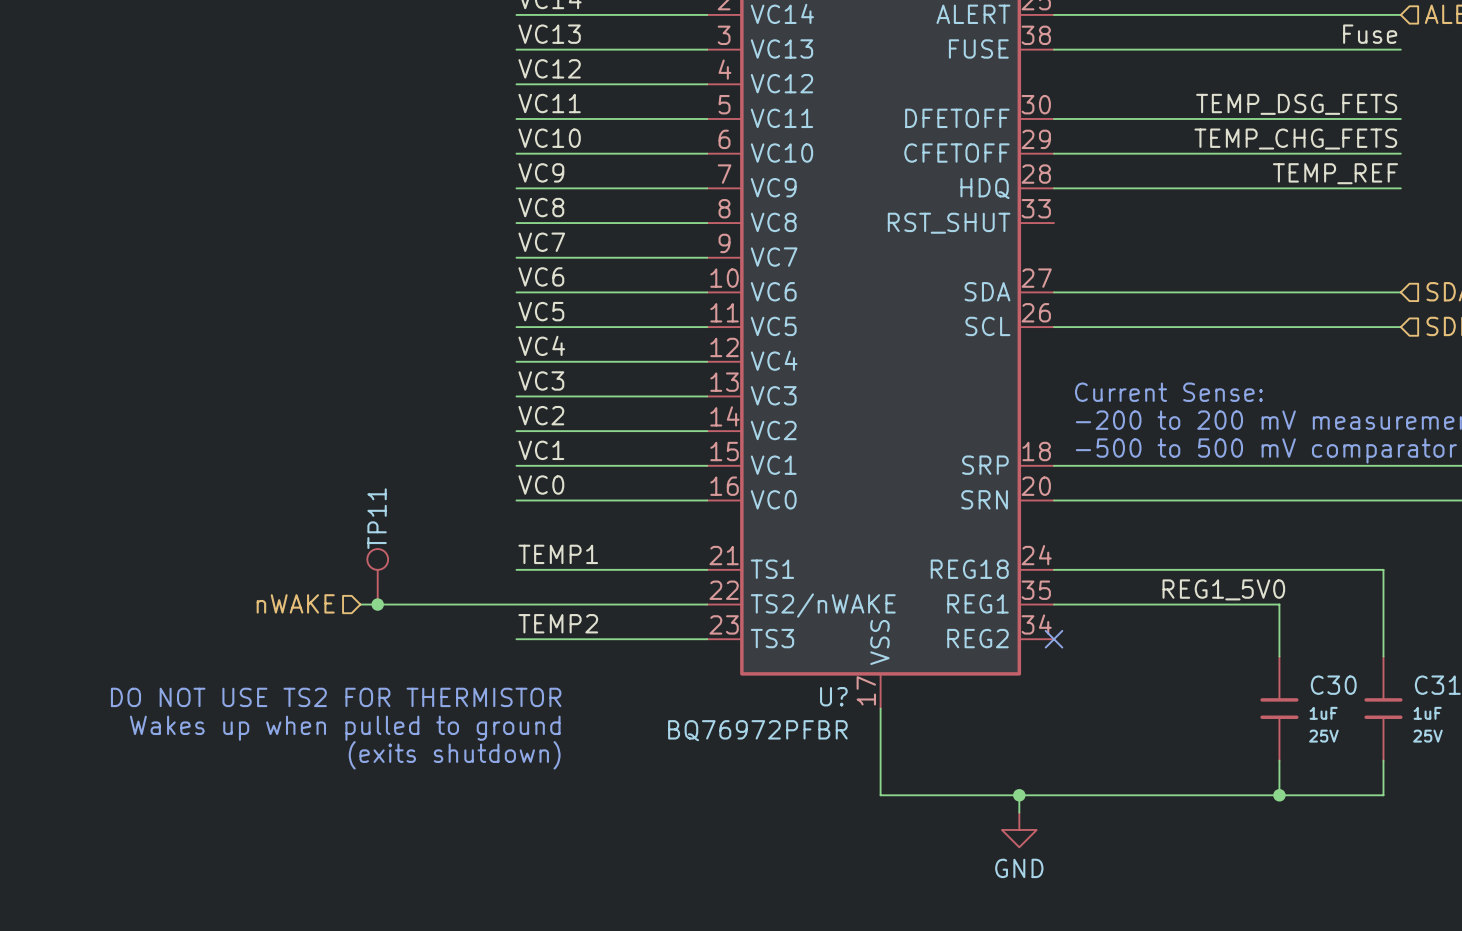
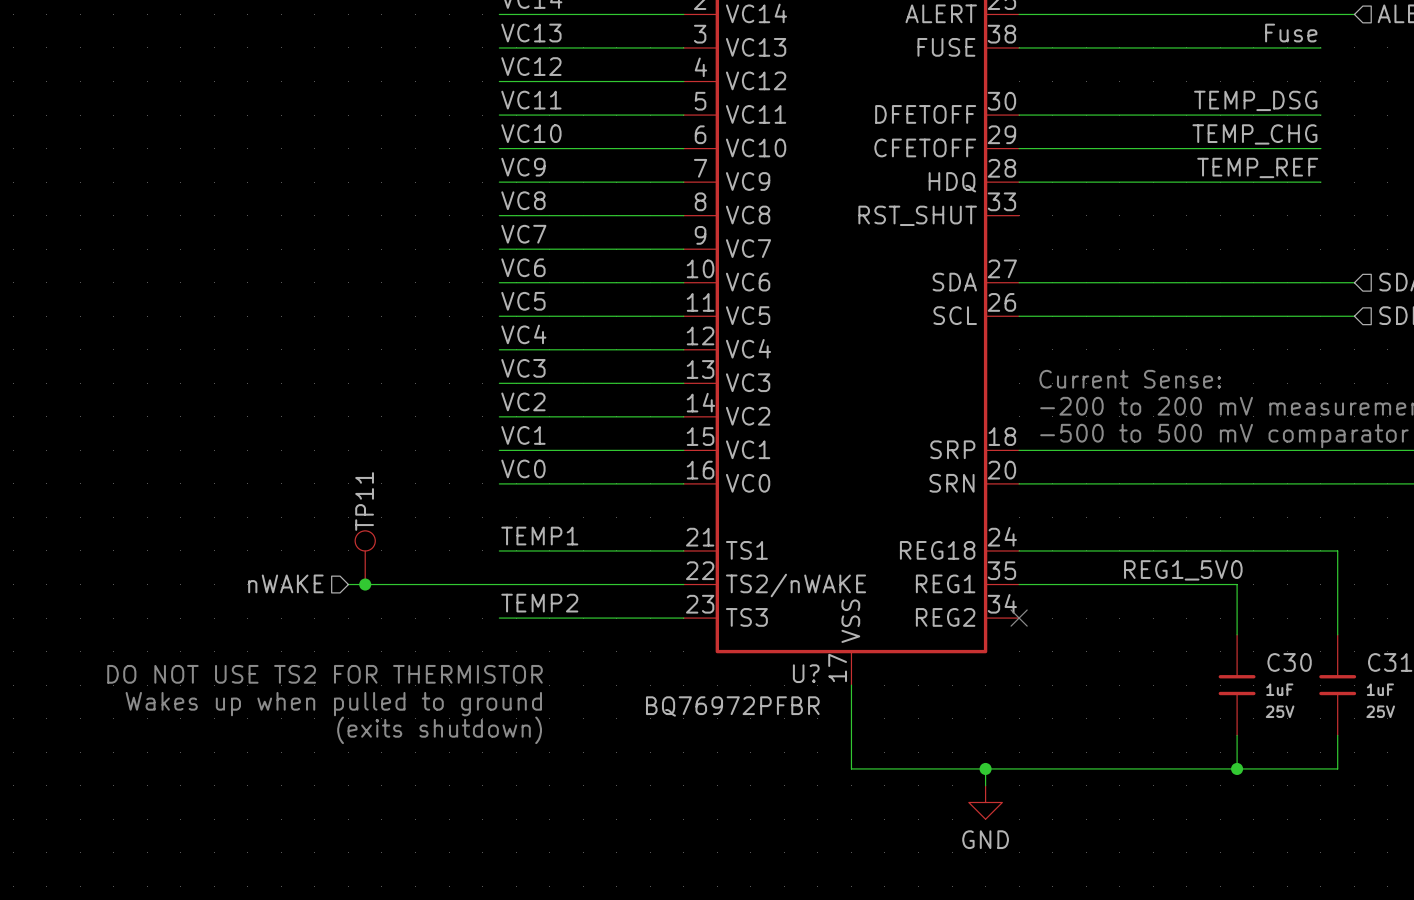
label position: Fuse (1370, 34) -> Fuse (1291, 33)
wire: (1366, 49) (1400, 49) -> none
label: TEMP_DSG_FETS (1296, 104) -> TEMP_DSG (1255, 100)
wire: (1366, 118) (1400, 118) -> none
label: TEMP_CHG_FETS (1295, 139) -> TEMP_CHG (1254, 134)
wire: (1366, 153) (1400, 153) -> none
label position: TEMP_REF (1335, 173) -> TEMP_REF (1257, 167)
wire: (1366, 188) (1400, 188) -> none

